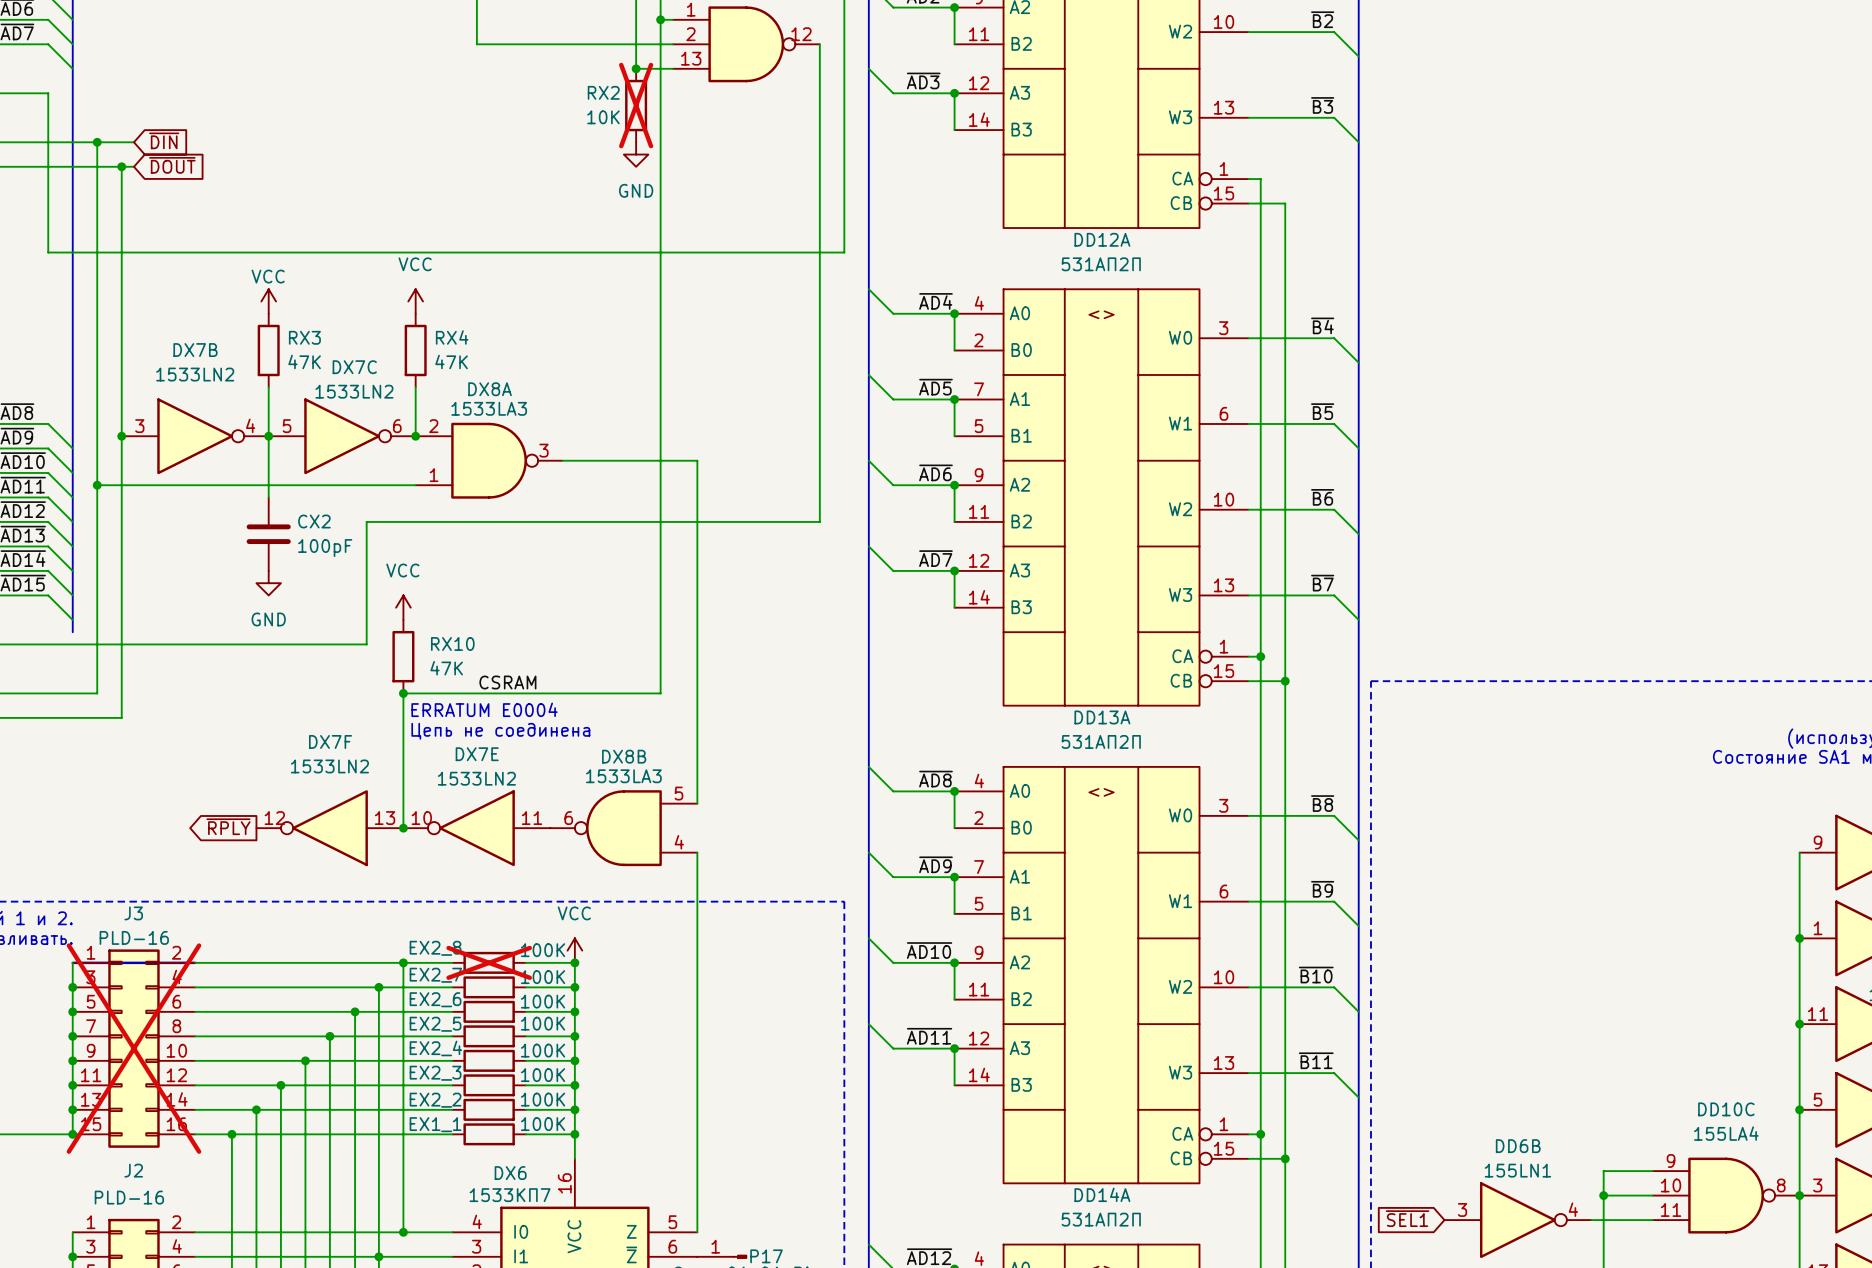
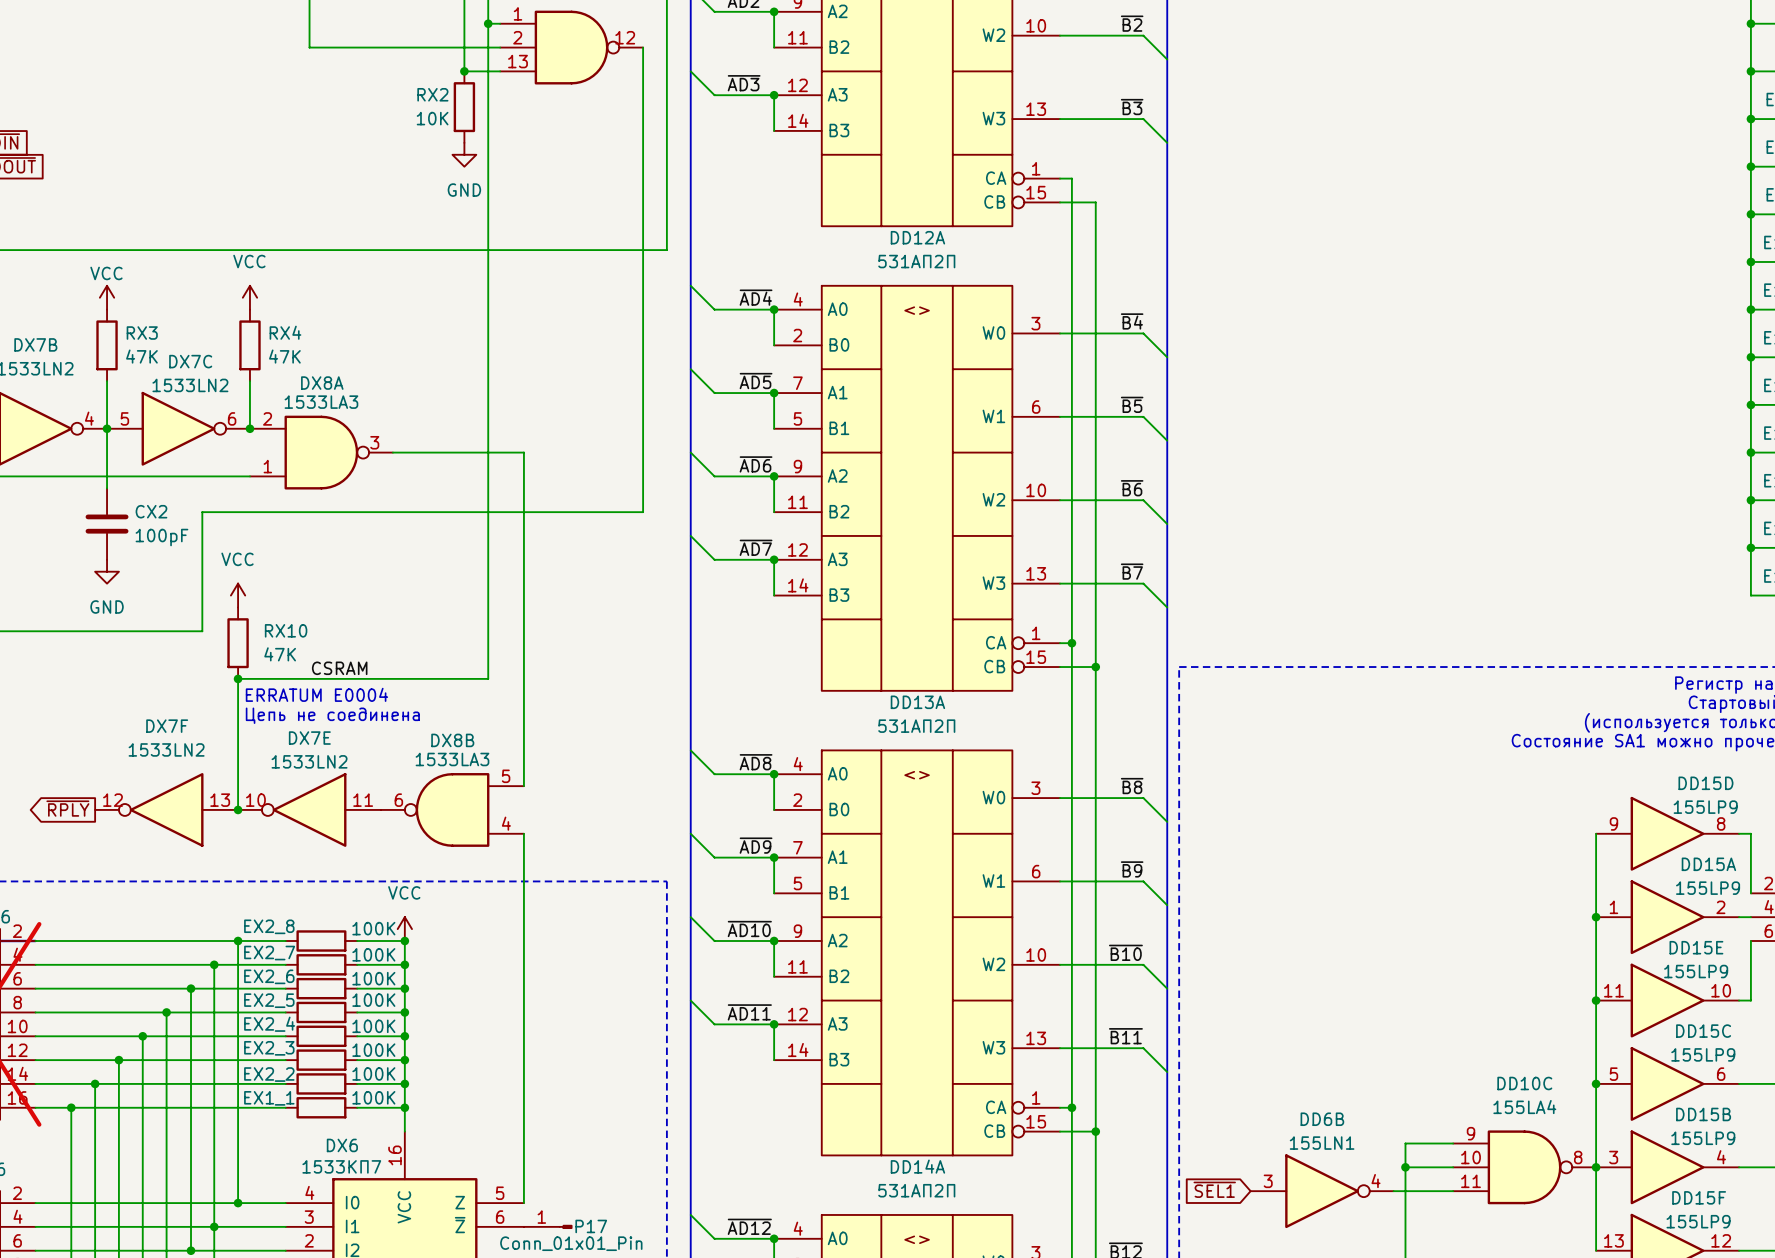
RX2 do-not-place cross: (636, 105) -> none
EX2_8 do-not-place cross: (489, 962) -> none

